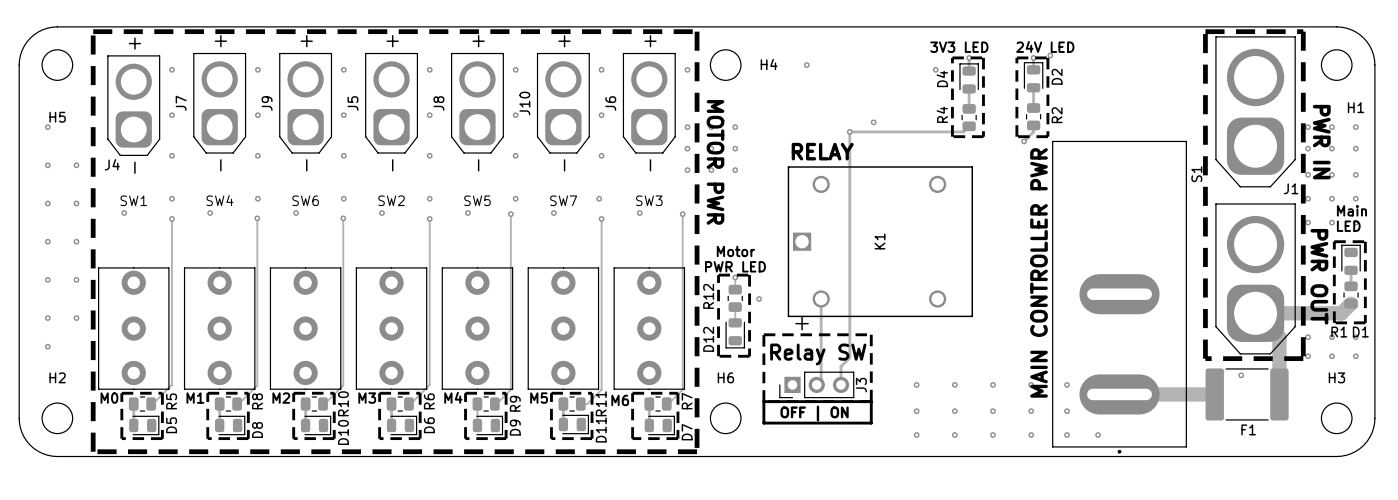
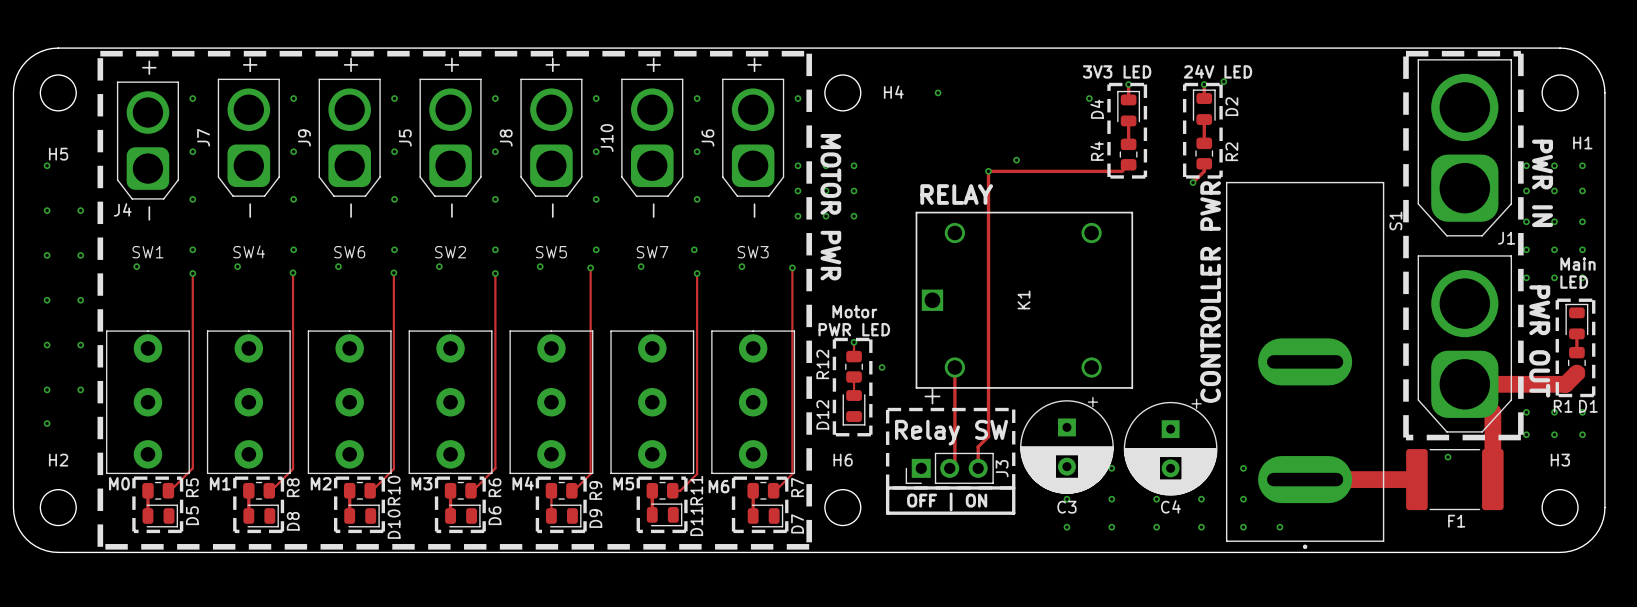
text: MAIN CONTROLLER PWR (1039, 272) -> CONTROLLER PWR (1210, 292)
C3: none -> (1066, 445)
C4: none -> (1170, 447)
via: (916, 384) -> none
via: (993, 384) -> none

